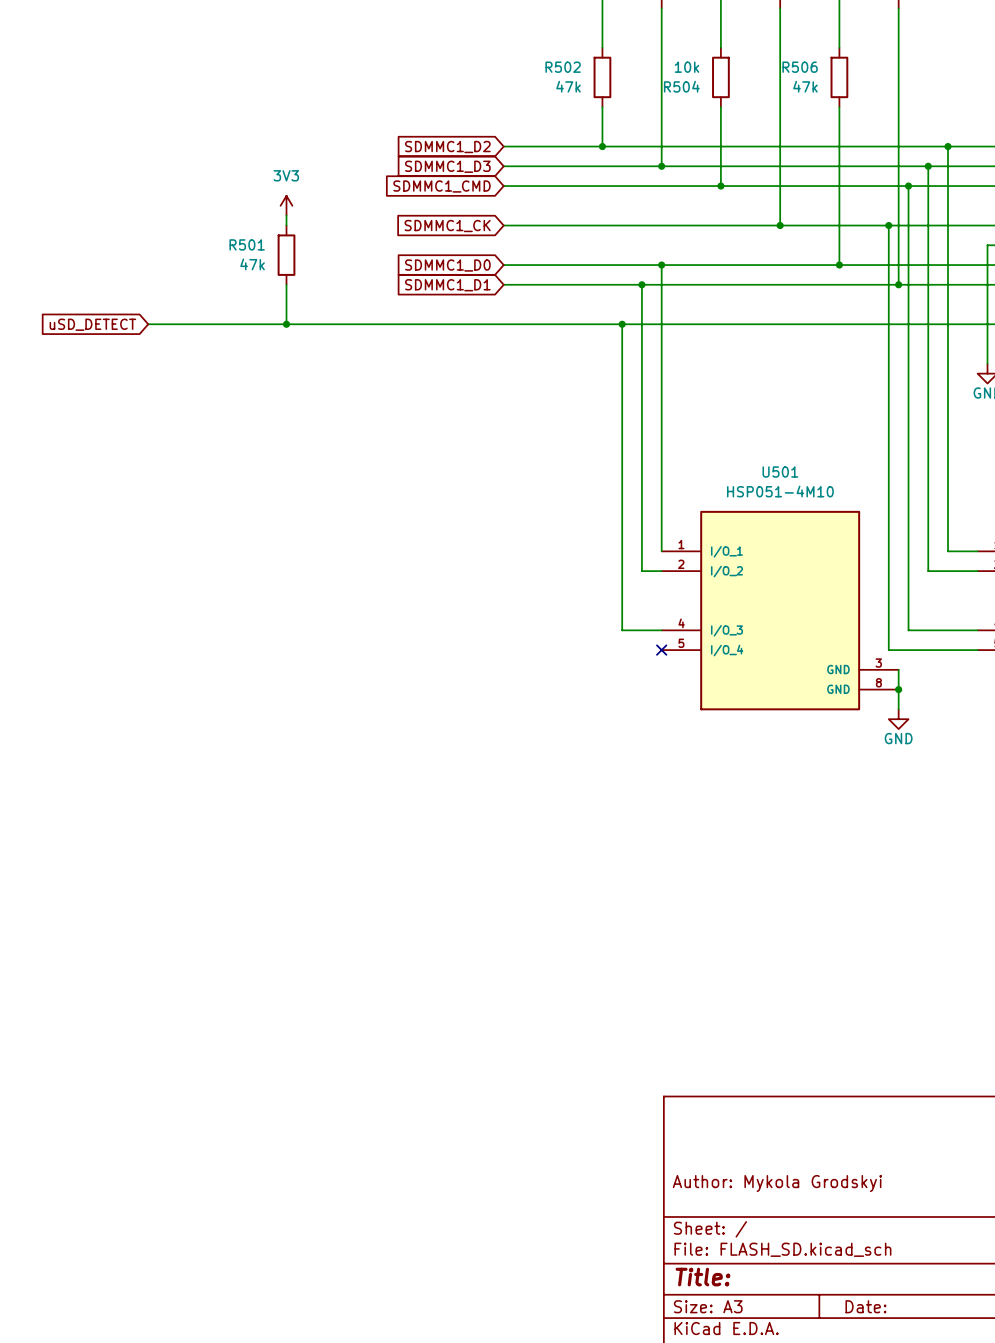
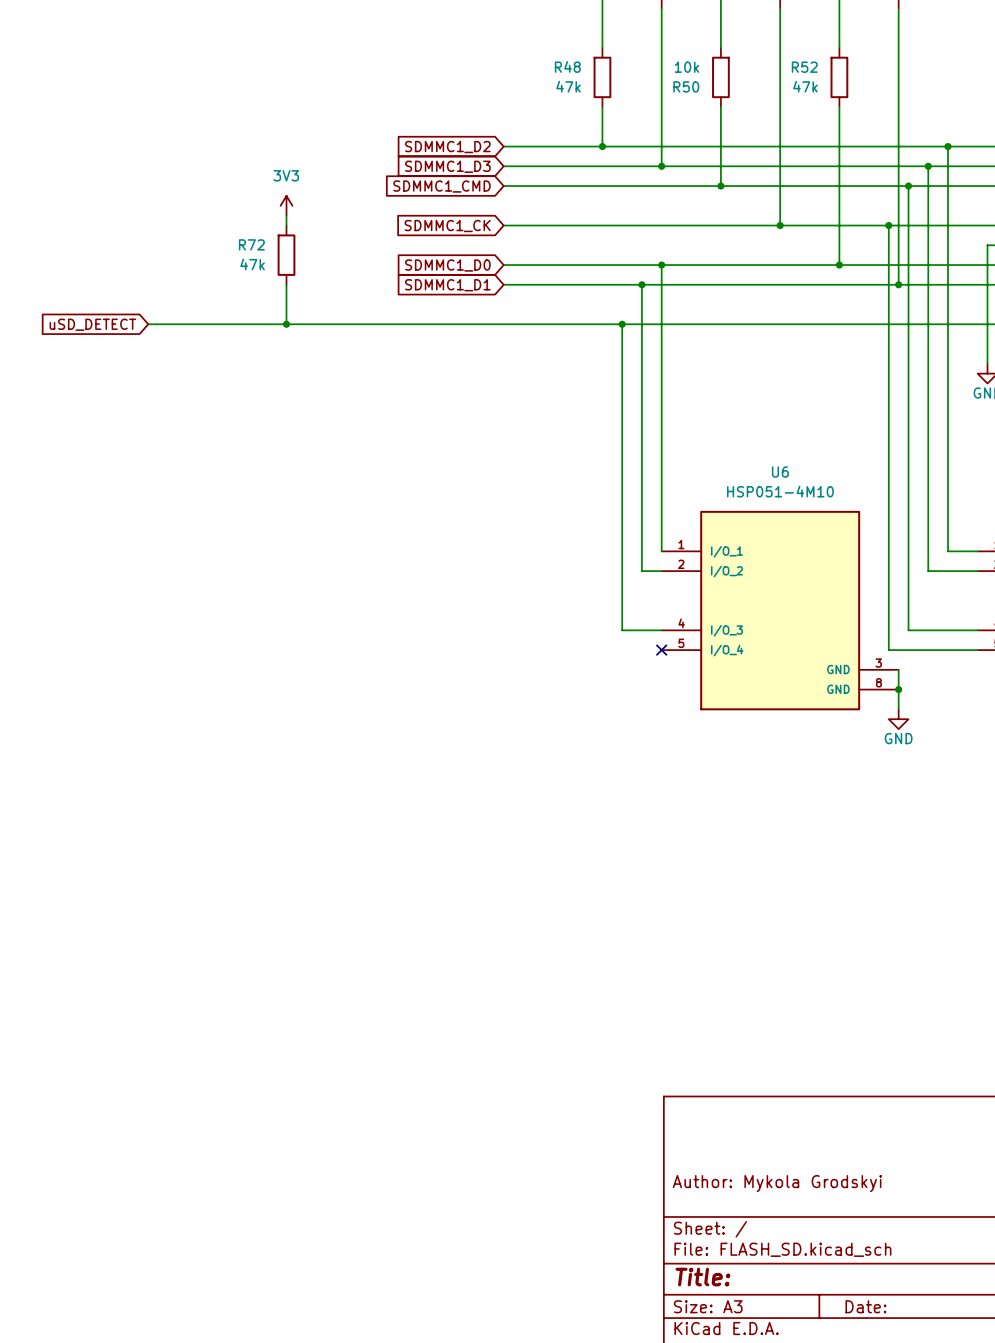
R502 name: R502 (563, 67) -> R48 (567, 66)
R506 name: R506 (800, 67) -> R52 (804, 67)
R504 name: R504 (681, 86) -> R50 (686, 86)
R501 name: R501 (247, 244) -> R72 (251, 244)
U501 name: U501 (780, 472) -> U6 (780, 472)

